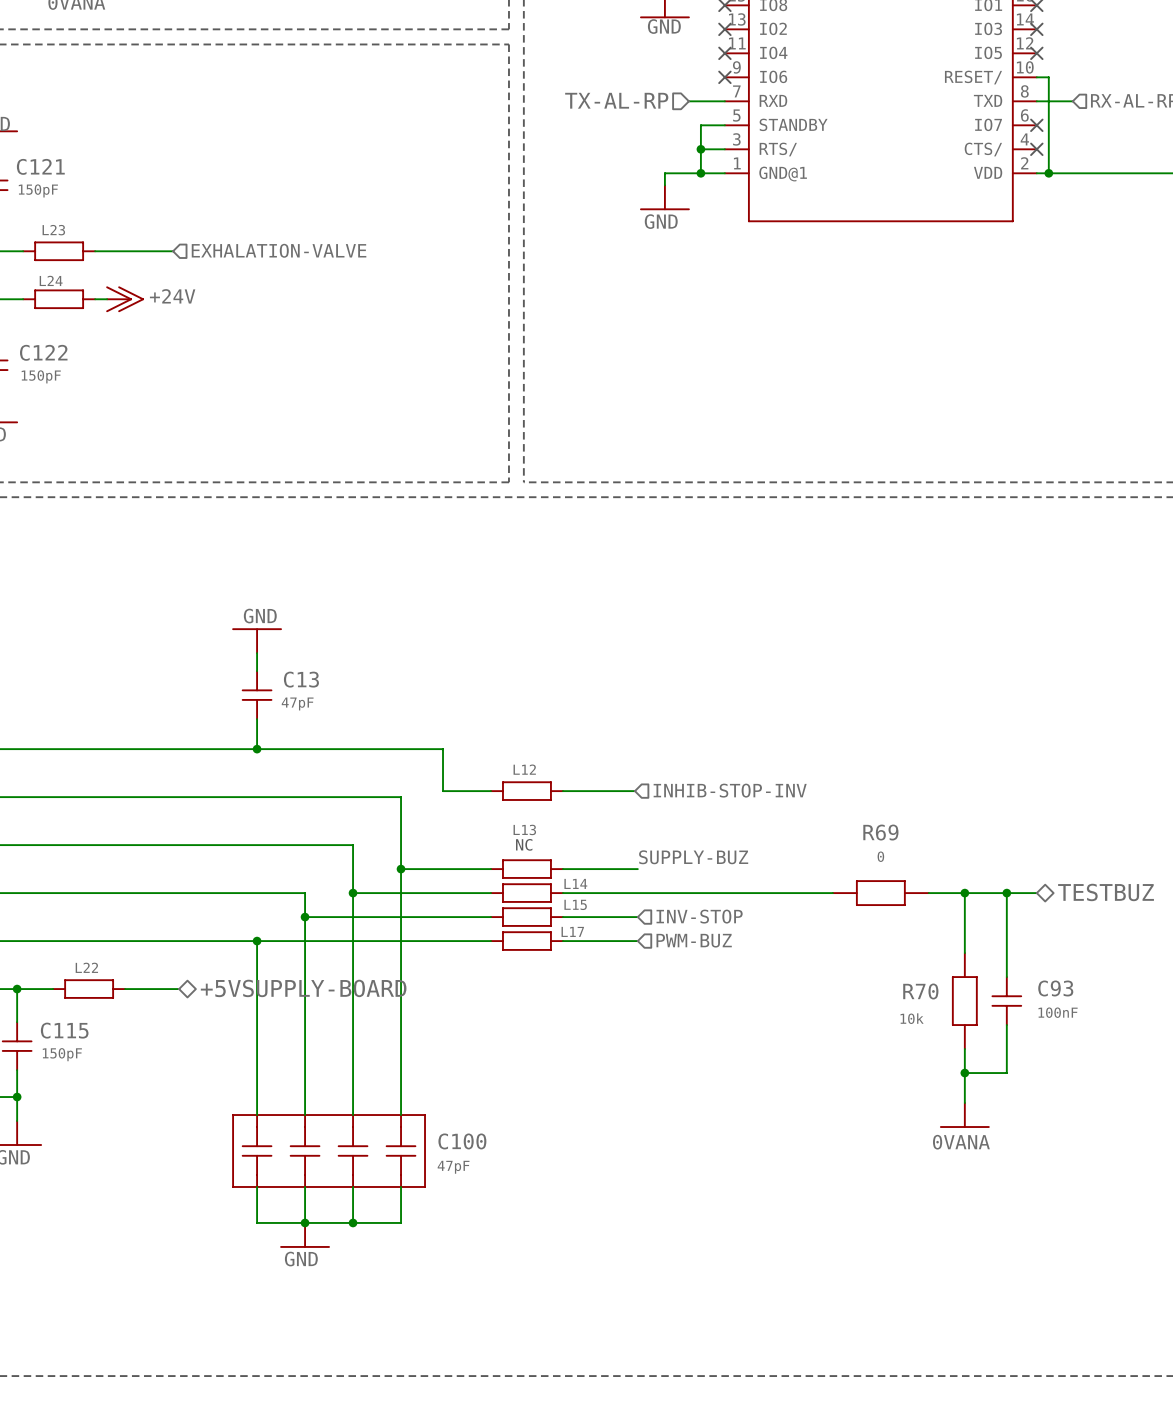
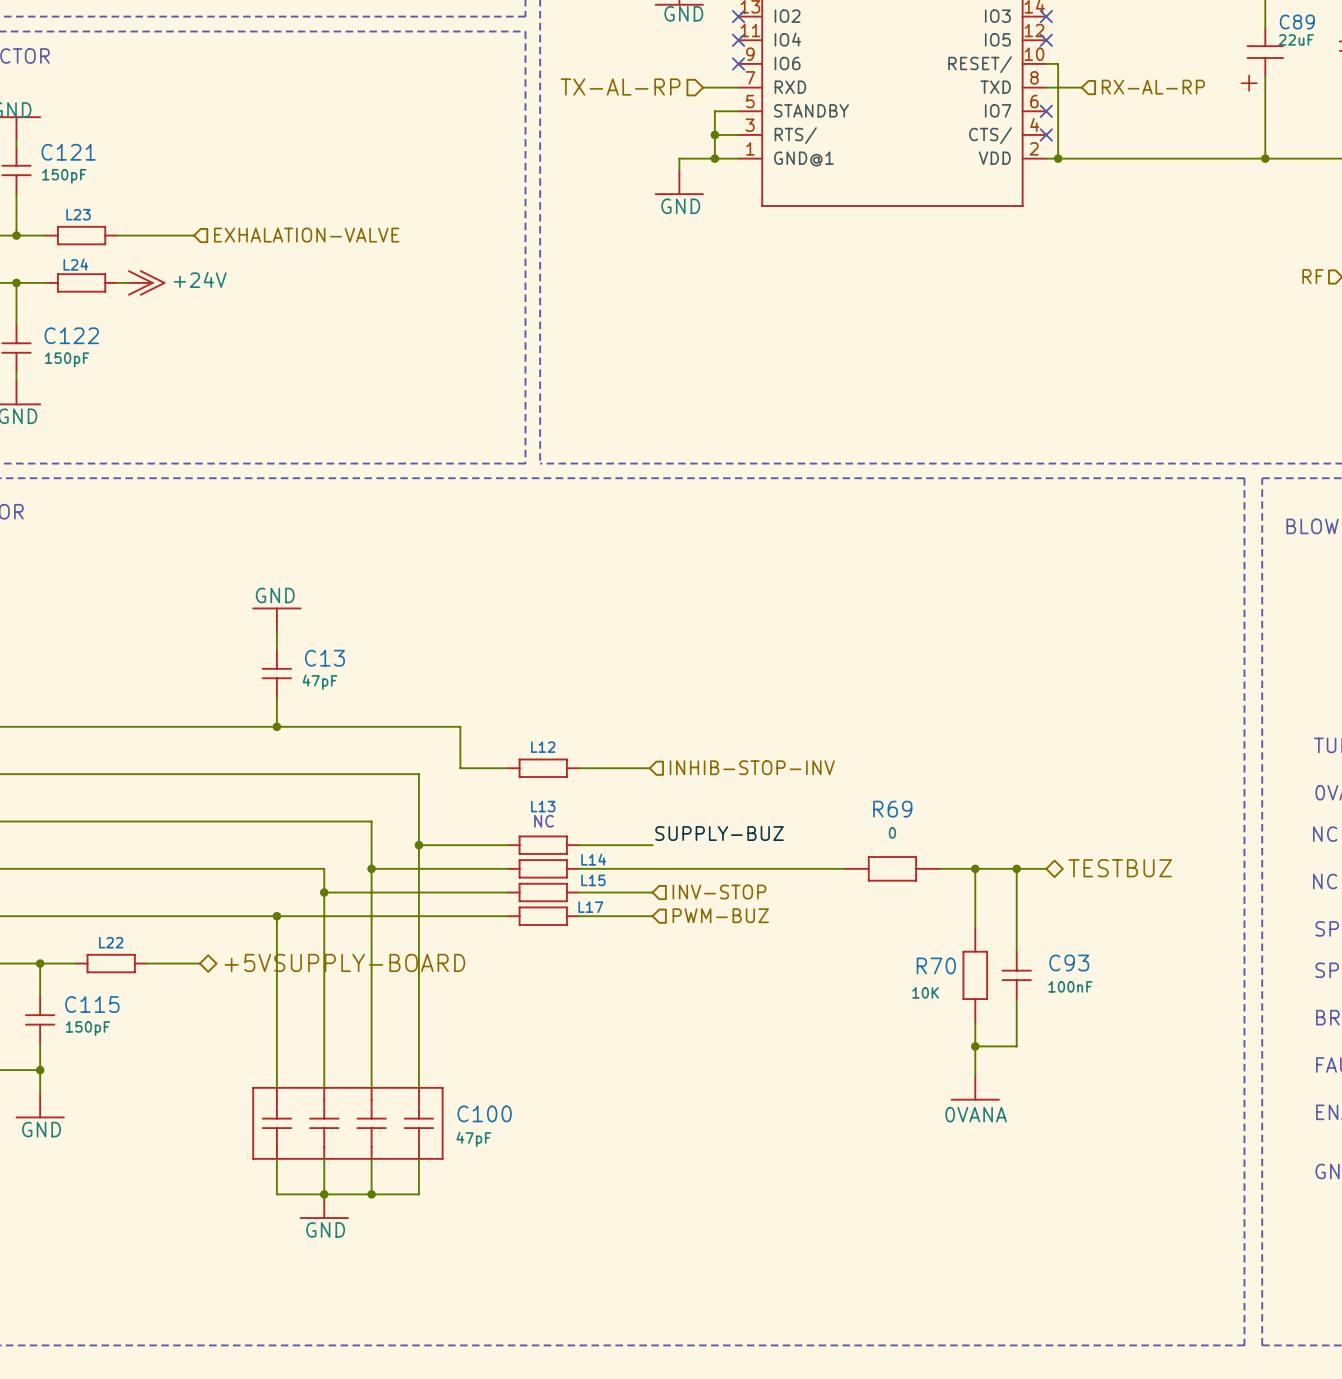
R70 value: 10k (912, 1018) -> 10K (925, 992)

